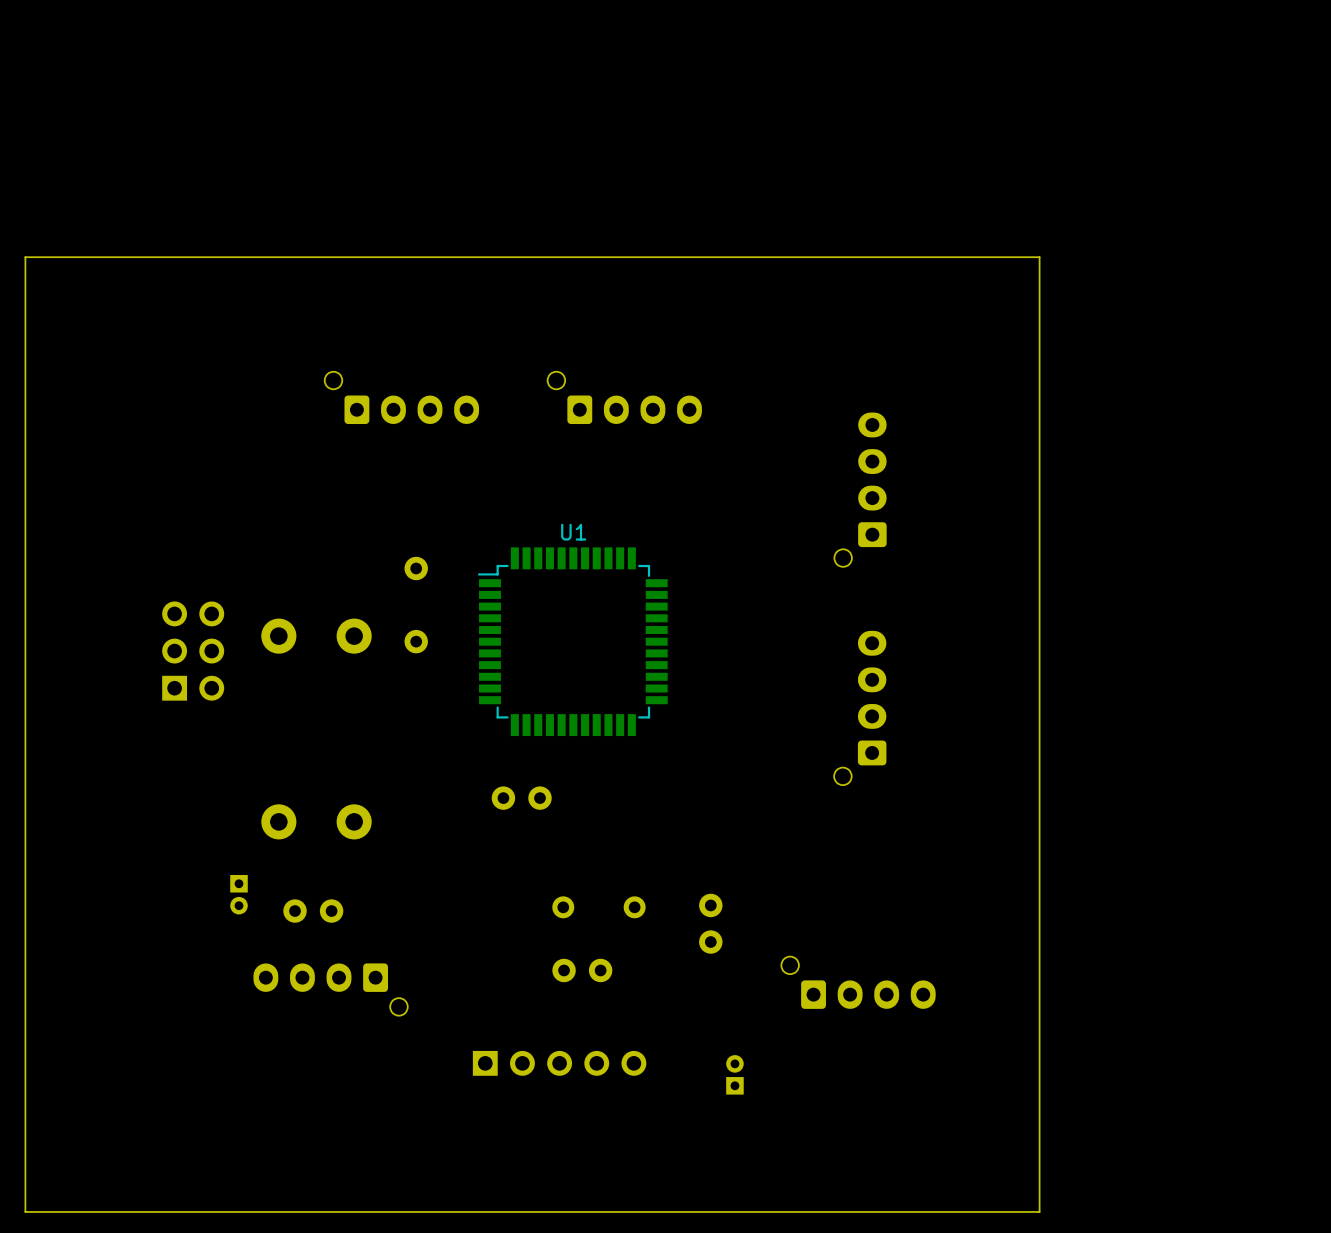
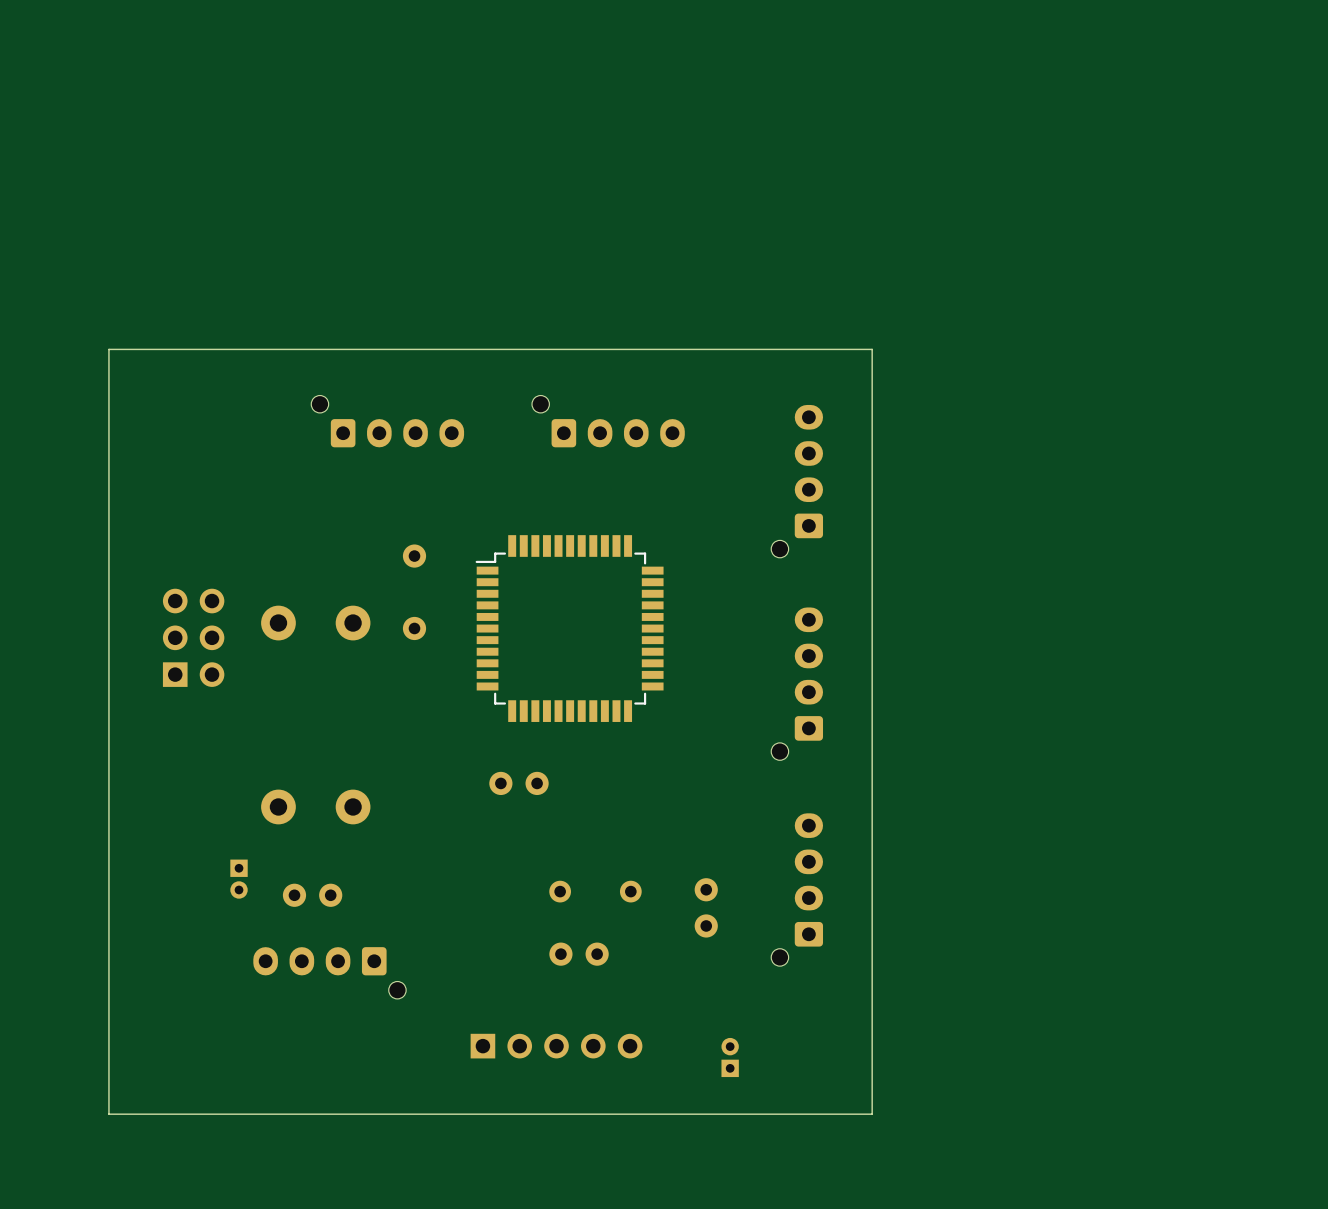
board edge: (1039, 257) (25, 257) (25, 1211) (1039, 1211) (1039, 257) -> (872, 349) (872, 1114) (108, 1114) (108, 349) (872, 349)
part position: (401, 397) -> (387, 421)
part position: (624, 397) -> (608, 421)
part position: (860, 489) -> (797, 481)
U1 name: U1 (573, 532) -> none
part position: (860, 707) -> (797, 683)
part rotation: 0° (858, 982) -> 90° counterclockwise (797, 889)
part position: (858, 982) -> (797, 889)

